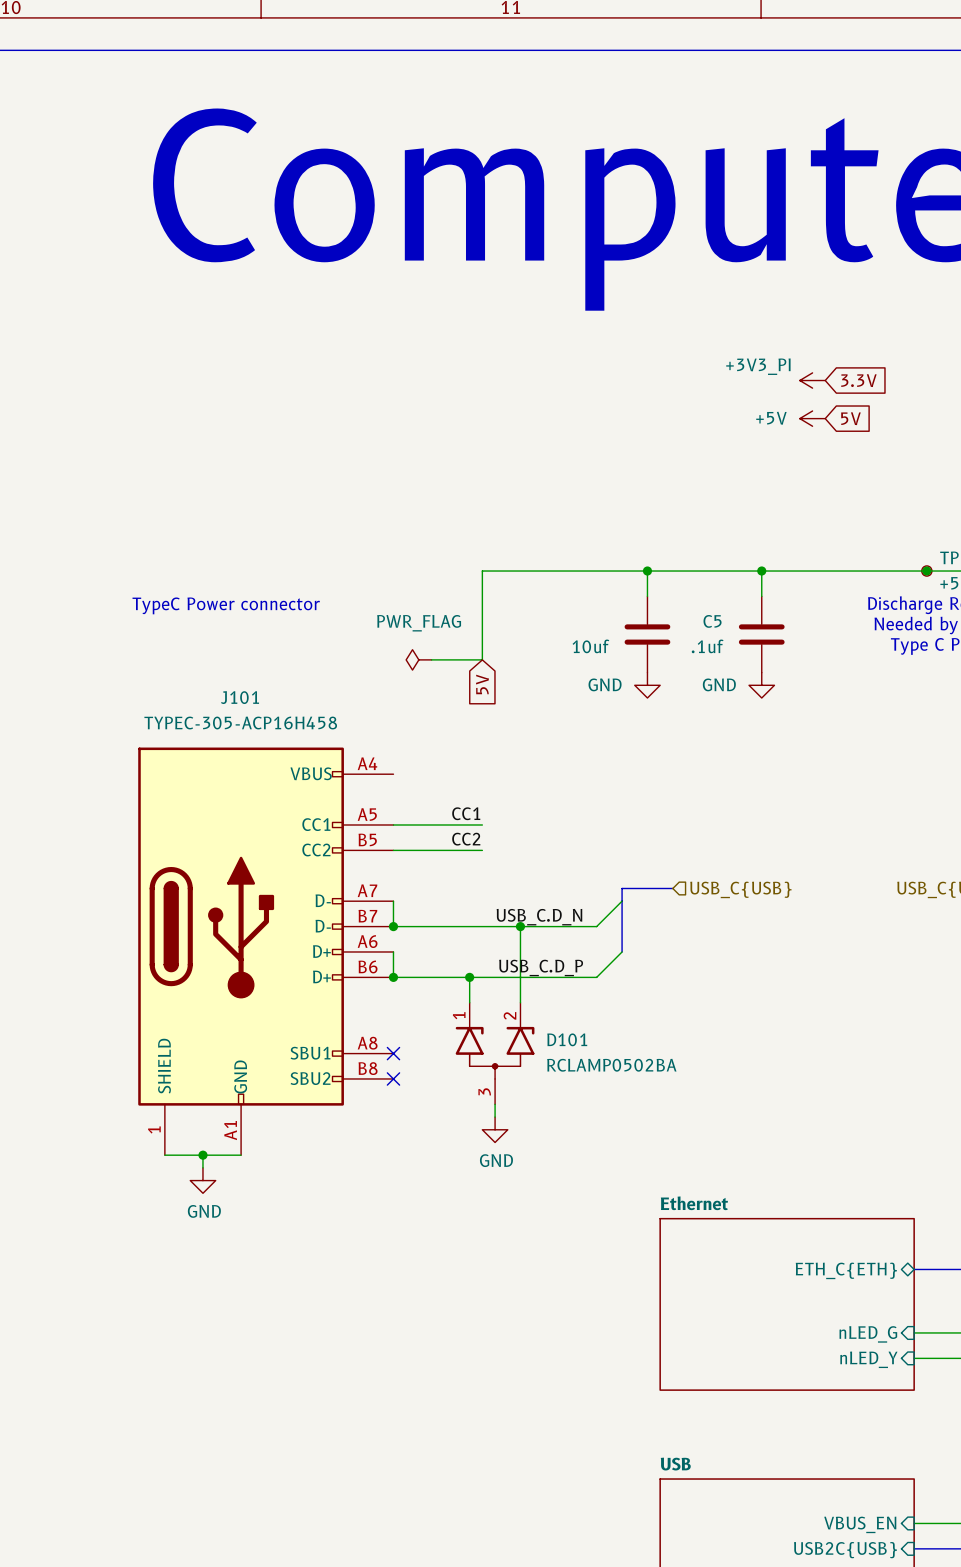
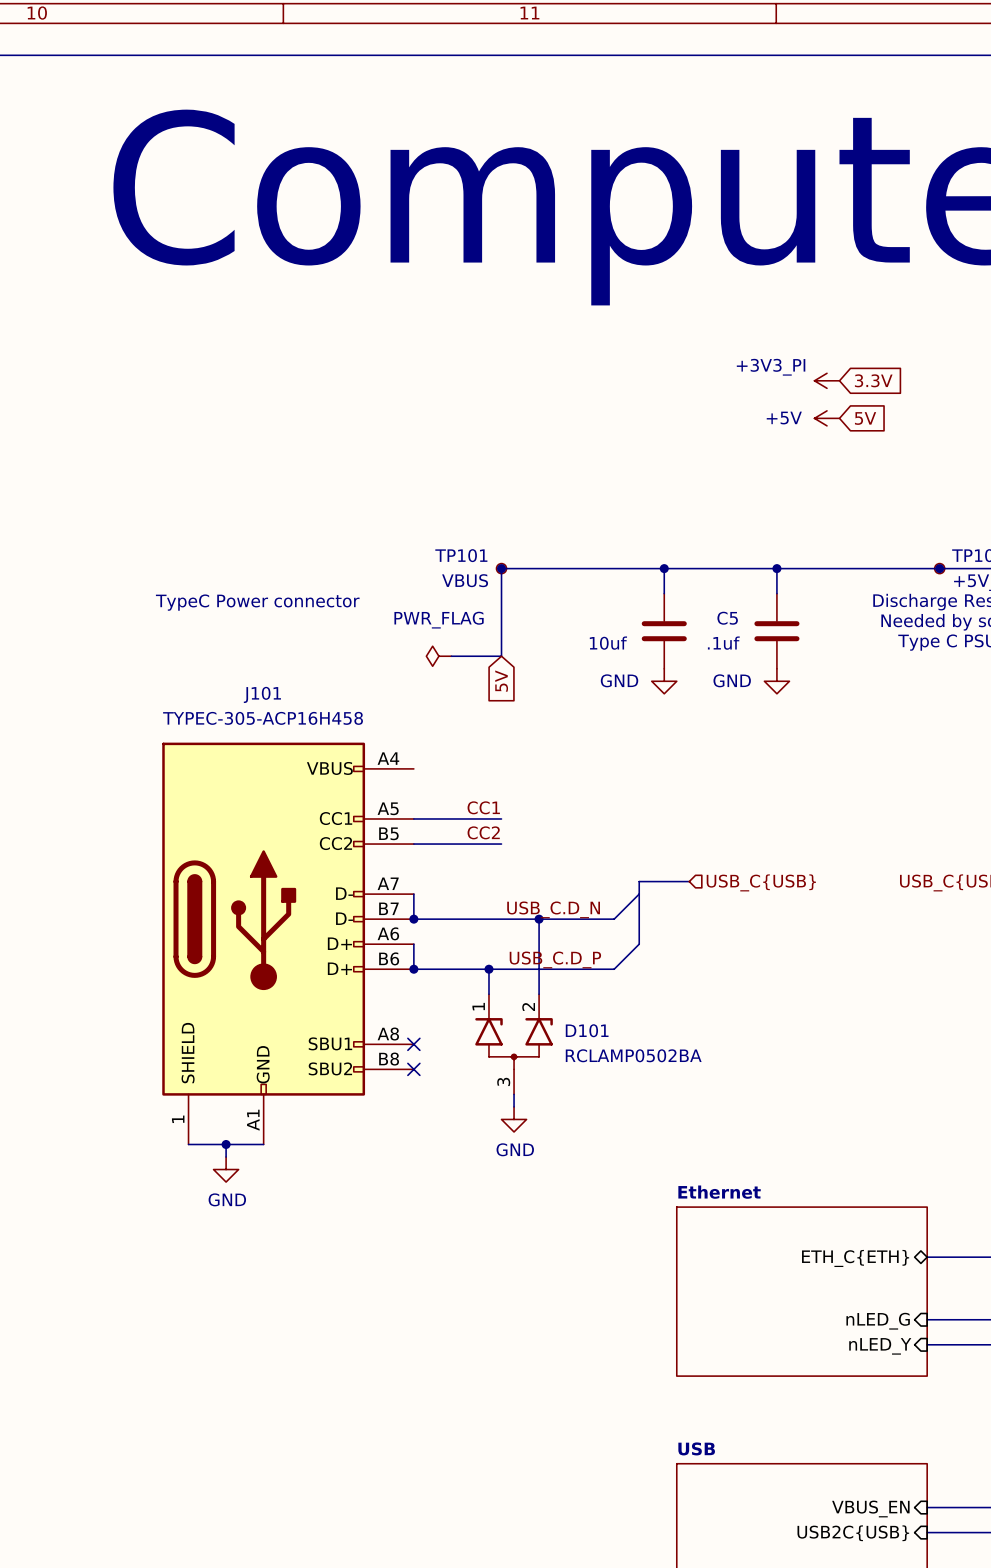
TP101: none -> VBUS (501, 568)
junction: none -> (501, 568)

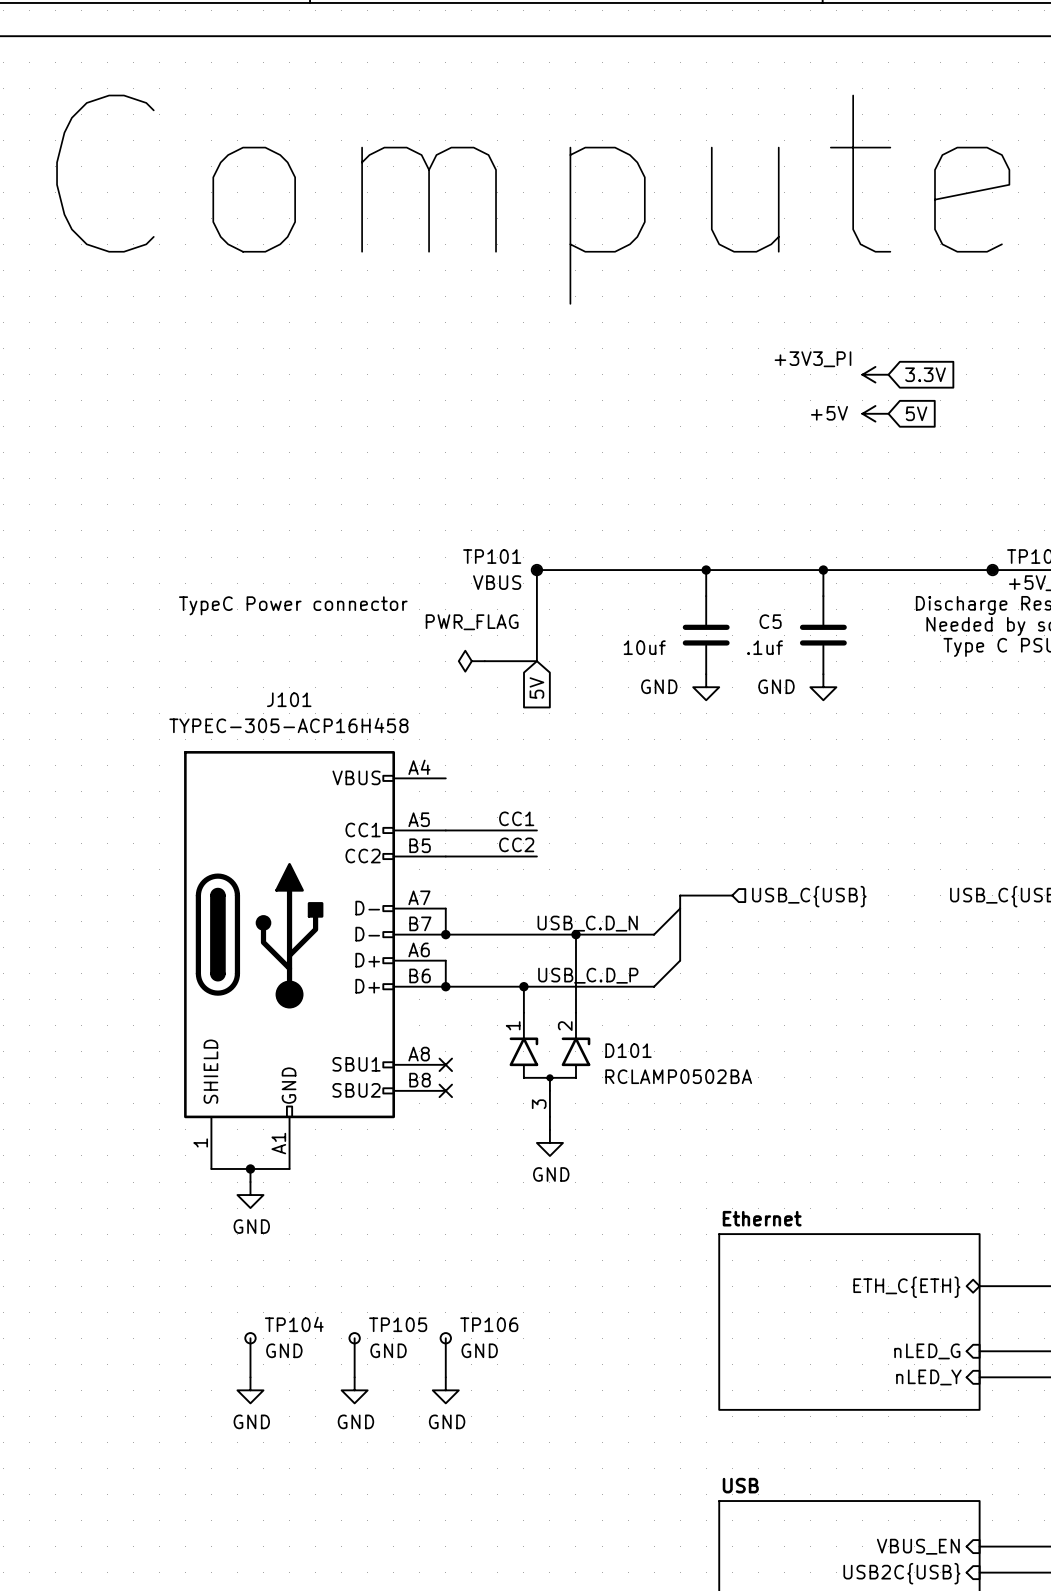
wire: none -> (250, 1338) (250, 1377)
TP104: none -> GND (250, 1338)
wire: none -> (354, 1338) (354, 1377)
TP105: none -> GND (354, 1338)
wire: none -> (445, 1338) (445, 1377)
TP106: none -> GND (445, 1338)
power symbol: none -> GND (250, 1390)
power symbol: none -> GND (354, 1390)
power symbol: none -> GND (445, 1390)

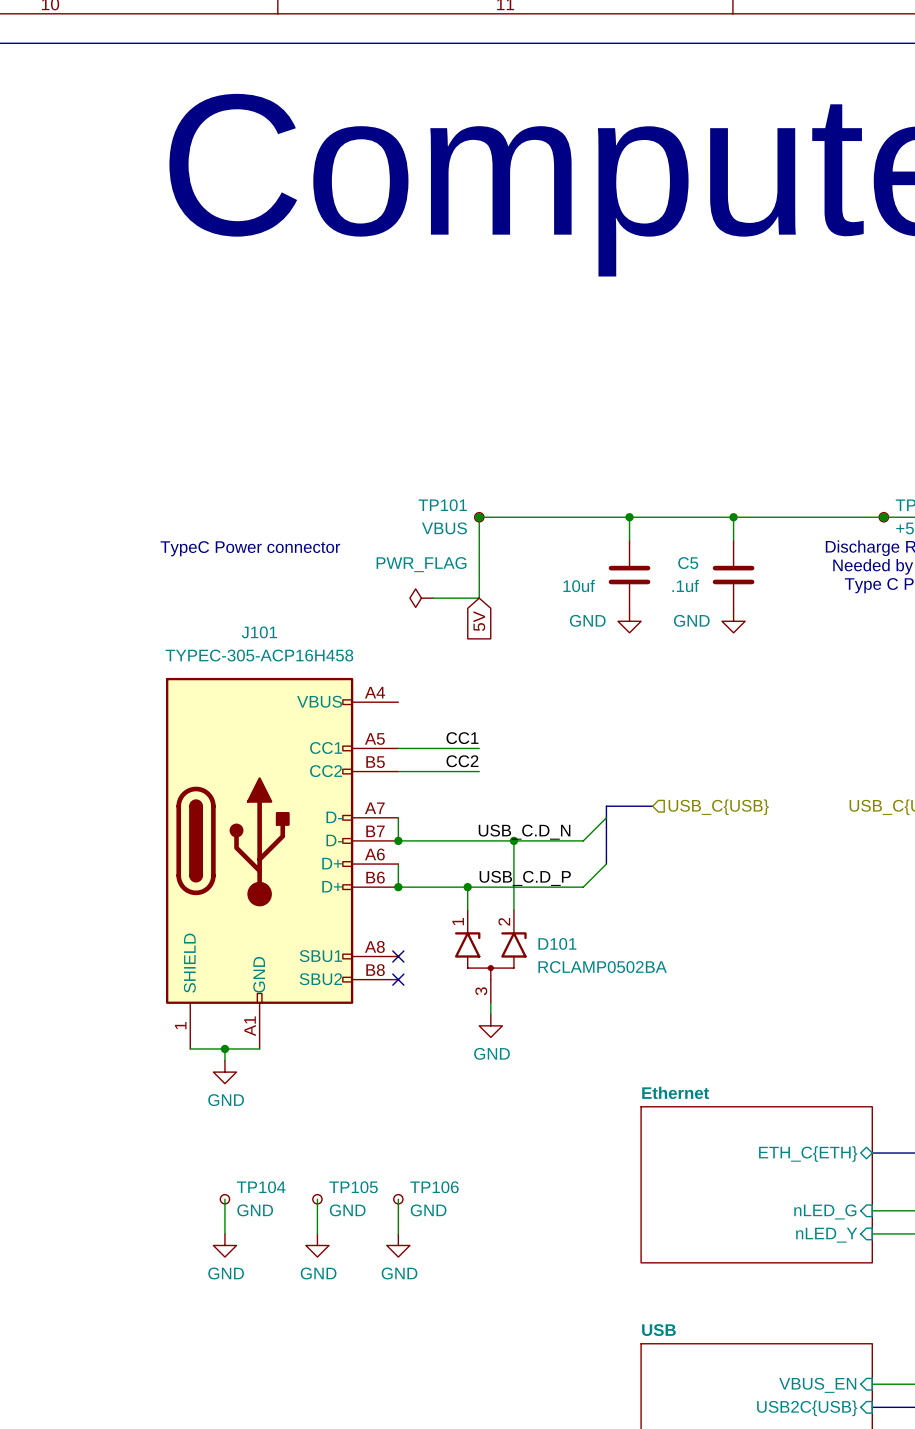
power symbol: +3V3_PI (875, 374) -> none
global label: 3.3V (925, 374) -> none
power symbol: +5V (875, 413) -> none
global label: 5V (916, 413) -> none

